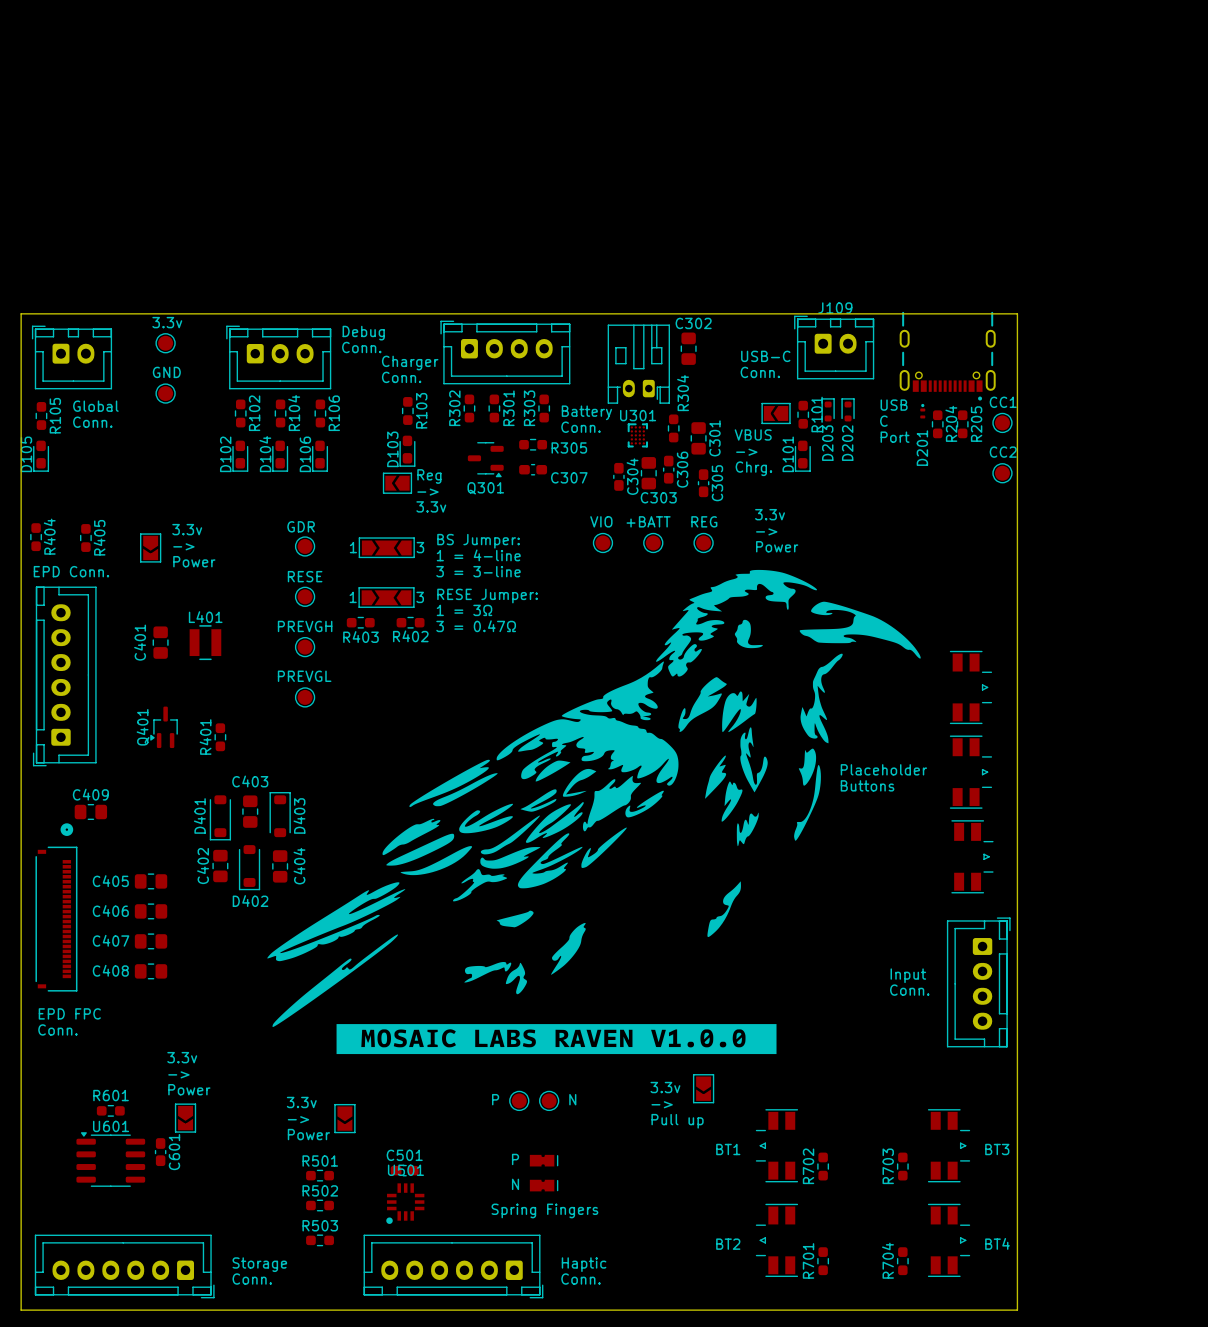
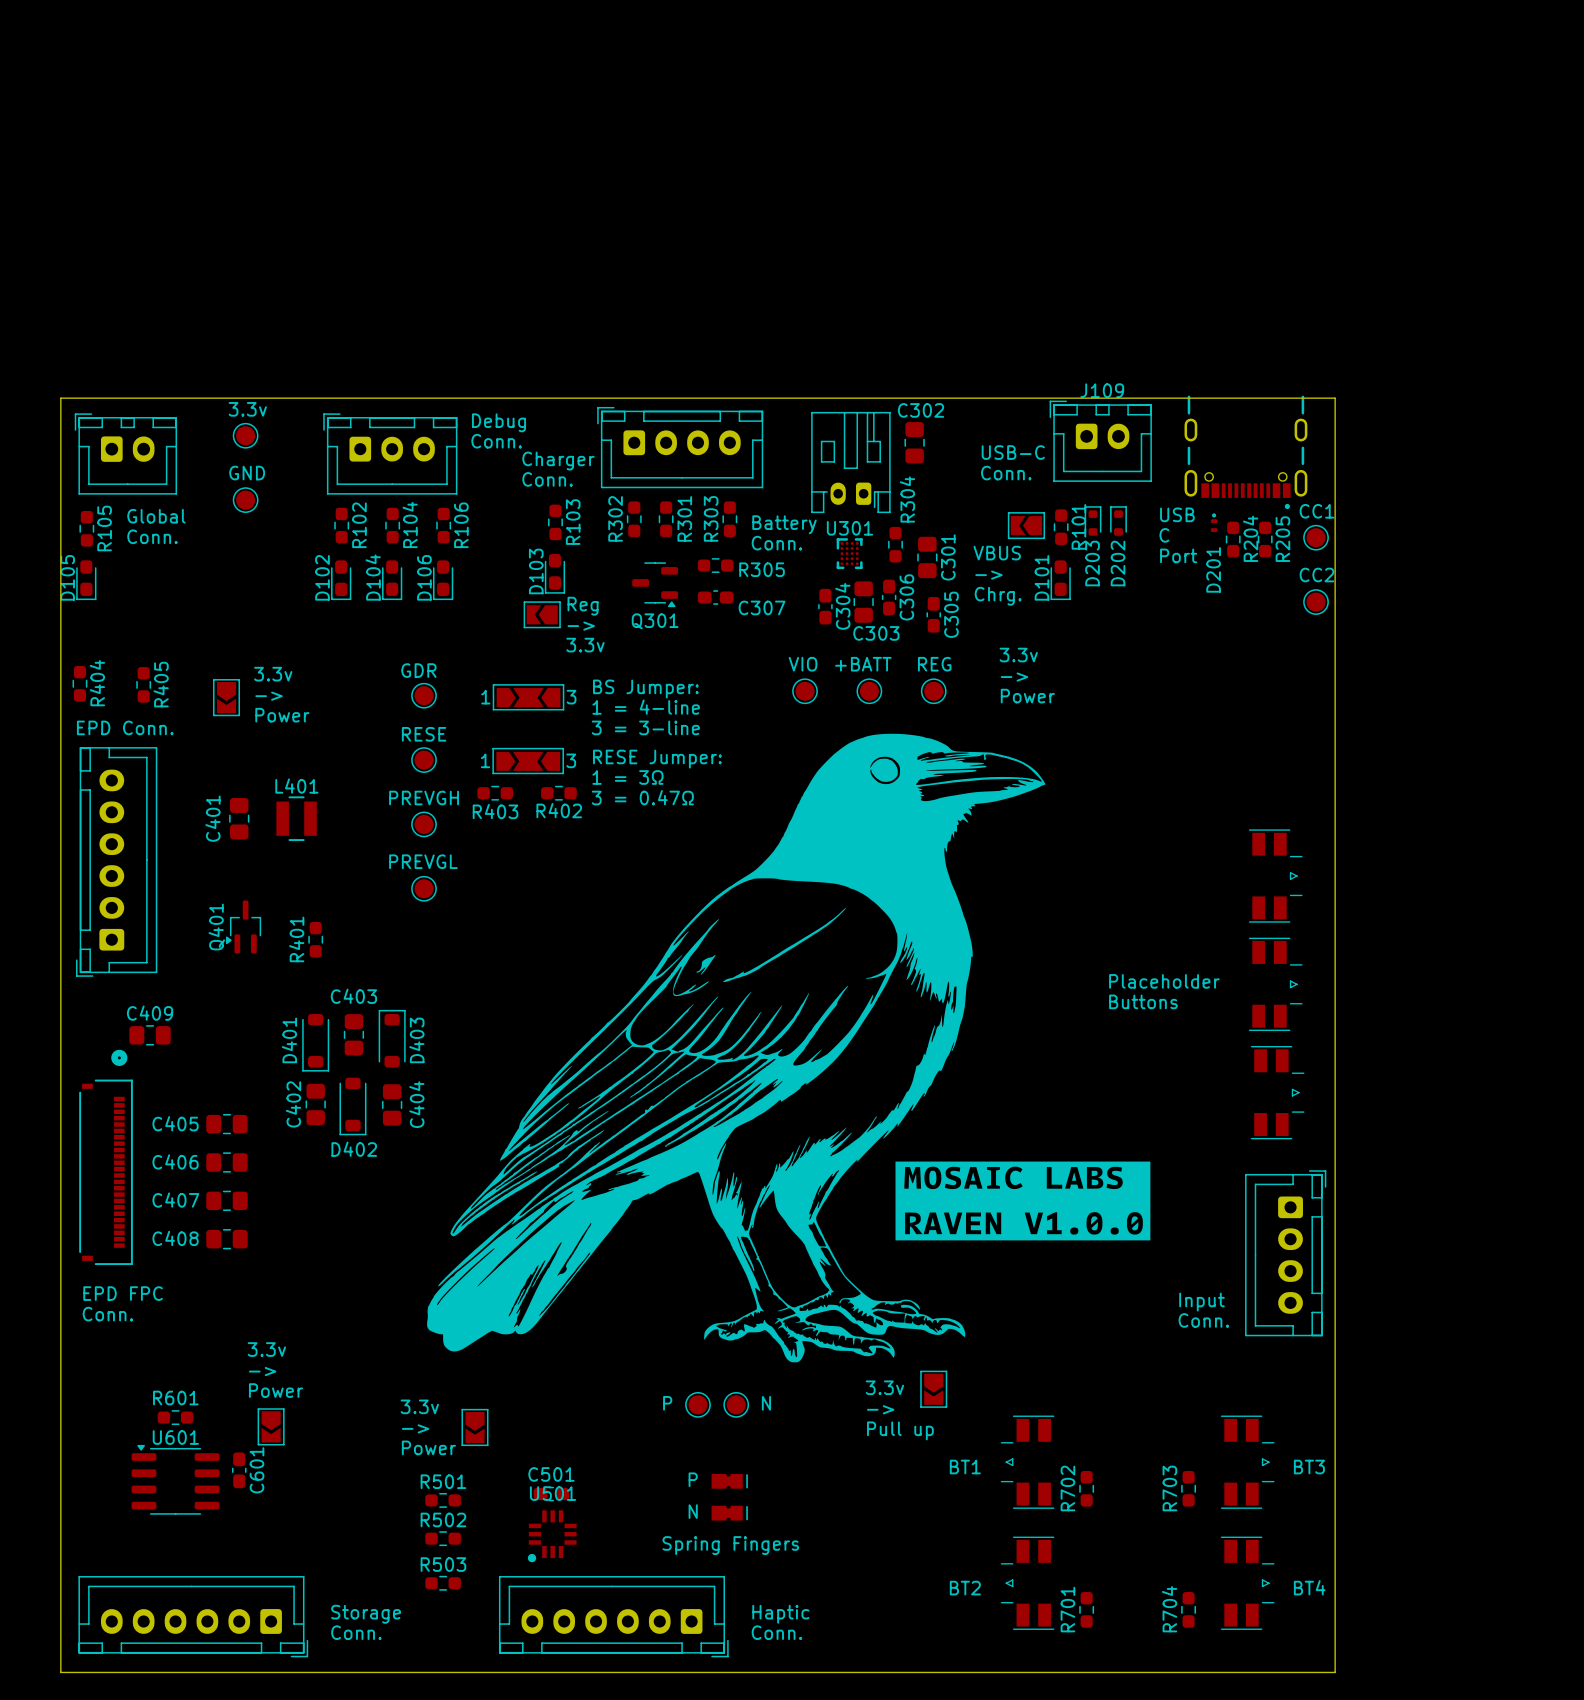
drawing: [267, 569, 921, 1055] -> none
drawing: none -> [427, 733, 1046, 1363]
part: none -> (1022, 1200)
text position: Input (908, 975) -> Input (1201, 1302)
text position: Conn. (909, 990) -> Conn. (1203, 1320)

